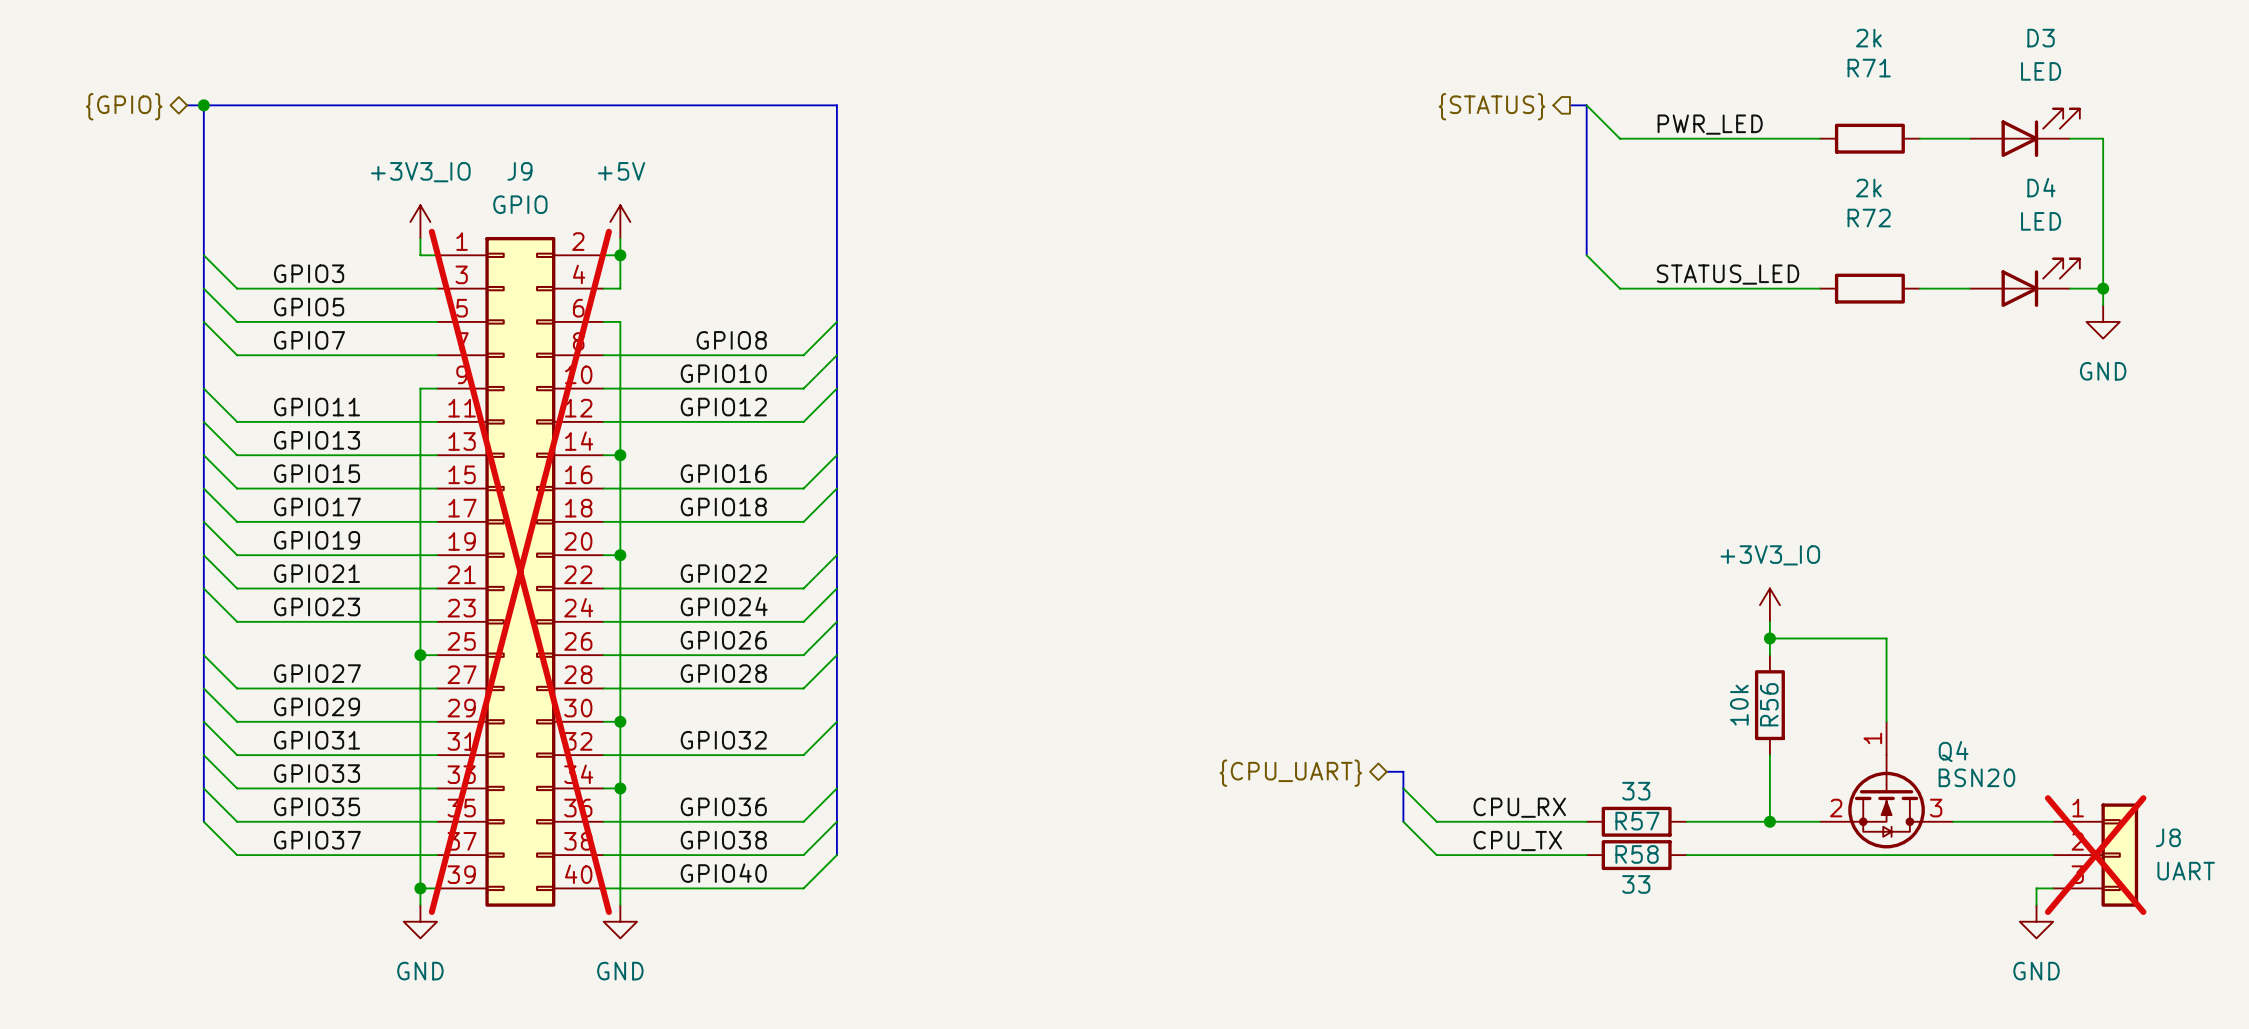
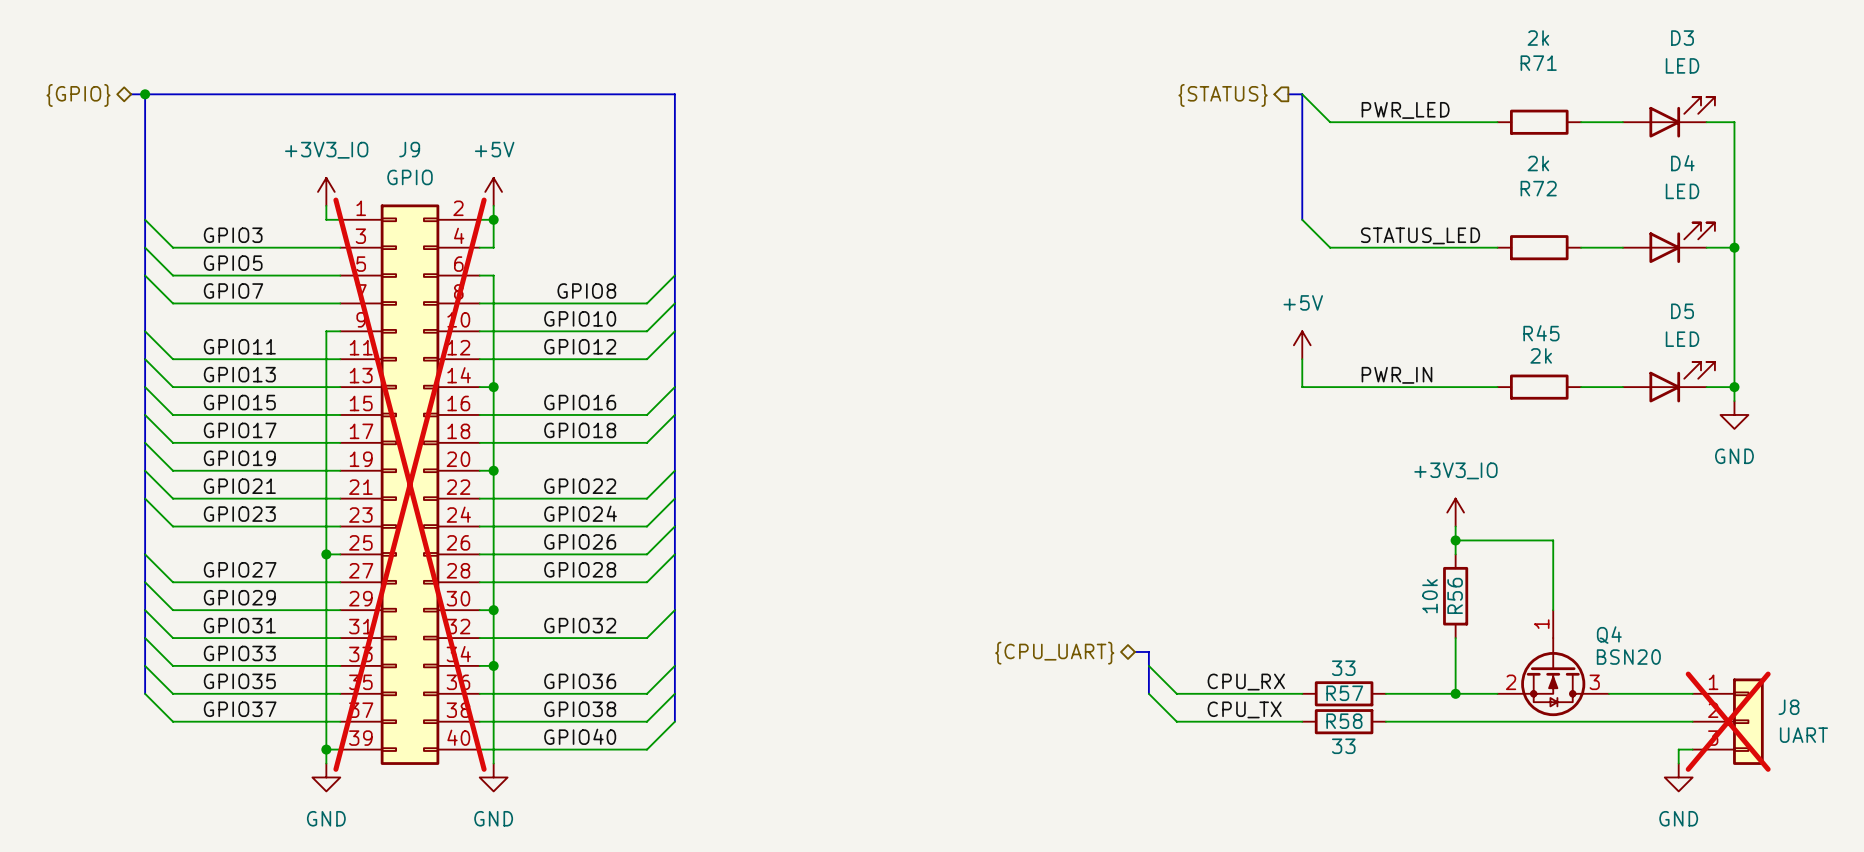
wire: none -> (1734, 261) (1734, 401)
power symbol position: GND (2103, 321) -> GND (1734, 414)
power symbol: none -> +5V (1302, 345)
wire: none -> (1302, 359) (1302, 387) (1497, 387)
label: none -> PWR_IN (1396, 375)
D5: none -> LED (1668, 382)
R45: none -> 2k (1539, 387)
wire: none -> (1581, 387) (1622, 387)
wire: none -> (1706, 387) (1734, 387)
junction: none -> (1734, 387)

